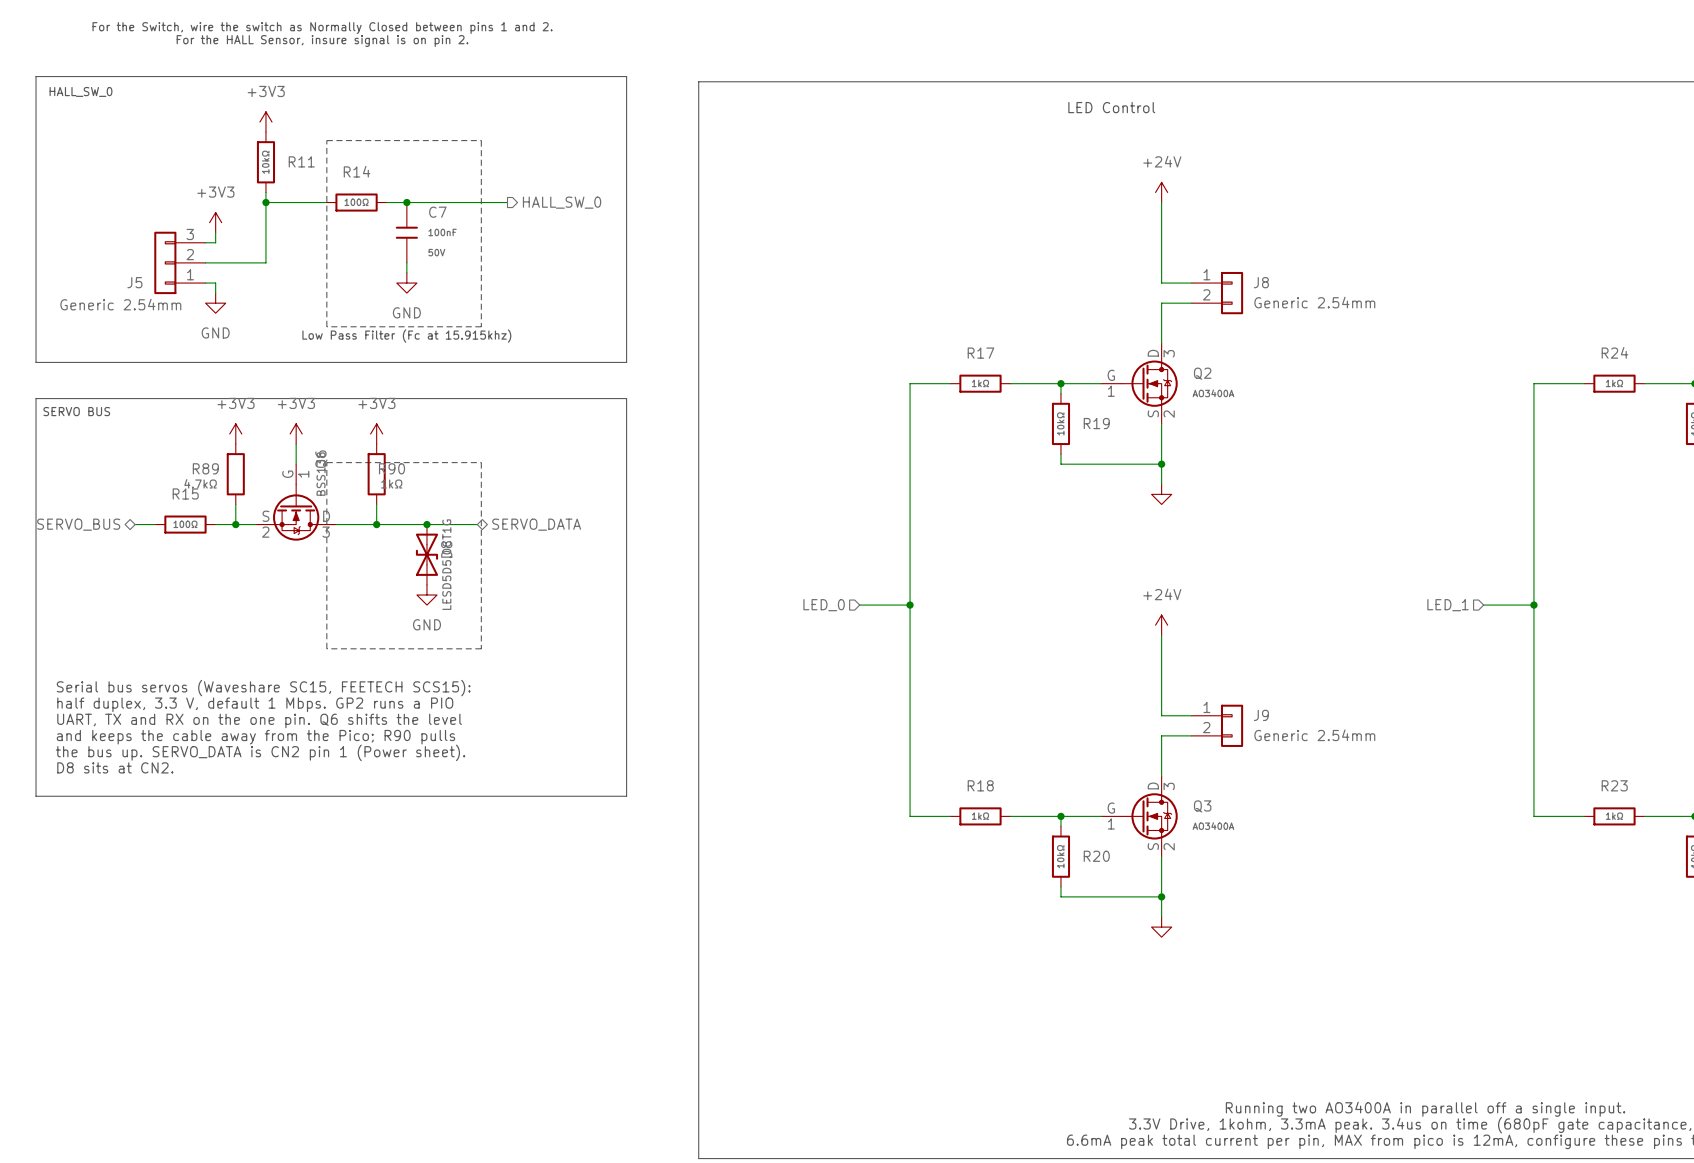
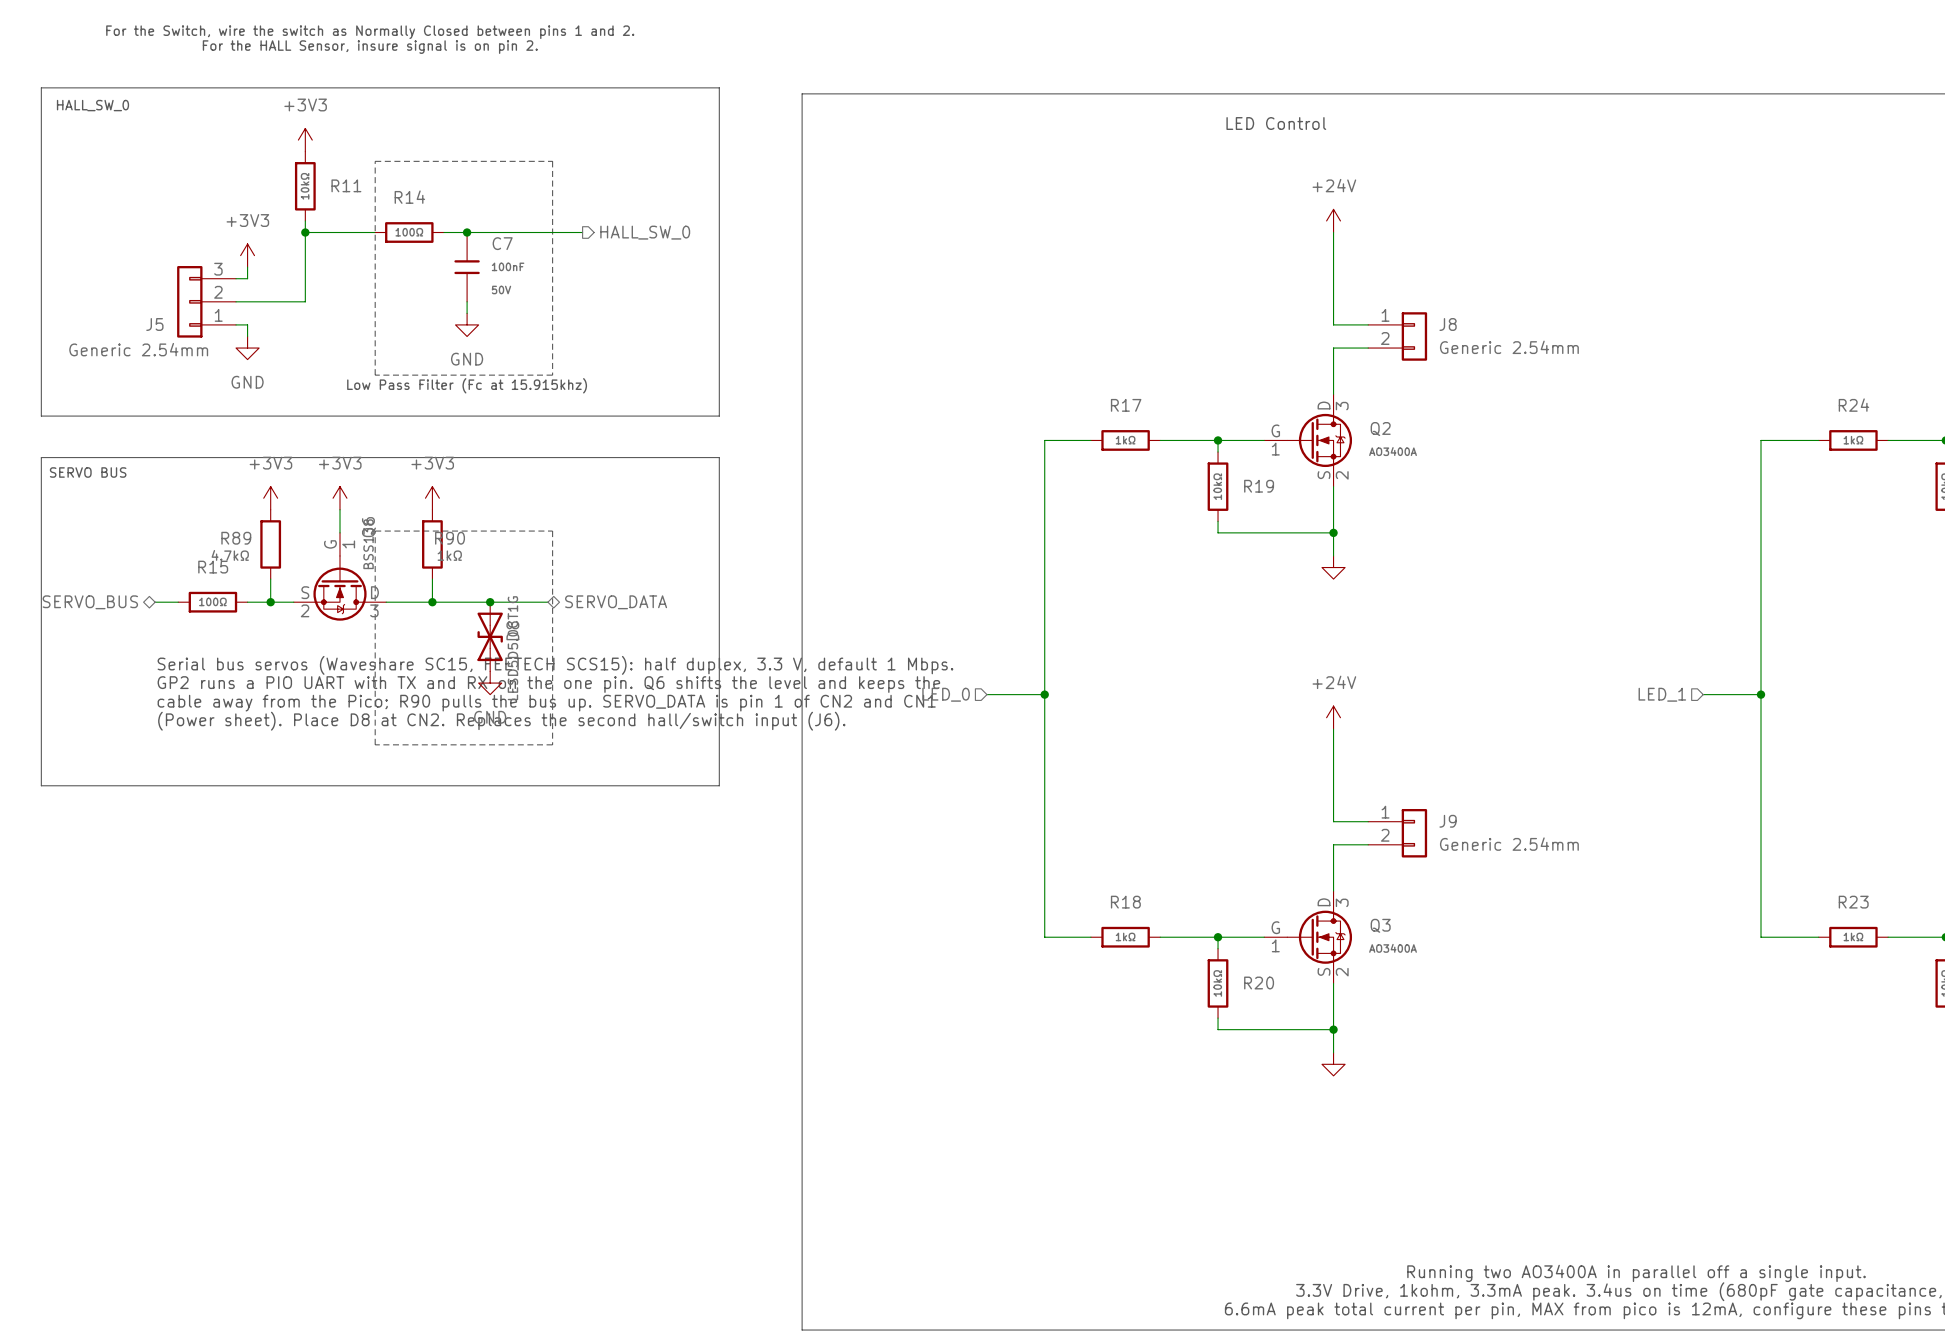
text: none -> Serial bus servos (Waveshare SC15, FEETECH SCS15): half duplex, 3.3 V, default 1 Mbps. (555, 665)
text: none -> GP2 runs a PIO UART with TX and RX on the one pin. Q6 shifts the level and keeps the (548, 684)
text: none -> cable away from the Pico; R90 pulls the bus up. SERVO_DATA is pin 1 of CN2 and CN1 (546, 703)
text: none -> (Power sheet). Place D8 at CN2. Replaces the second hall/switch input (J6). (501, 721)
line: (36, 684) (36, 796) (626, 796) (626, 684) -> (41, 785) (719, 785)
text: Serial bus servos (Waveshare SC15, FEETECH SCS15): (263, 688) -> none
text: half duplex, 3.3 V, default 1 Mbps. GP2 runs a PIO (255, 704) -> none
text: UART, TX and RX on the one pin. Q6 shifts the level (259, 720) -> none
text: and keeps the cable away from the Pico; R90 pulls (255, 737) -> none
text: the bus up. SERVO_DATA is CN2 pin 1 (Power sheet). (260, 752) -> none
text: D8 sits at CN2. (115, 767) -> none

